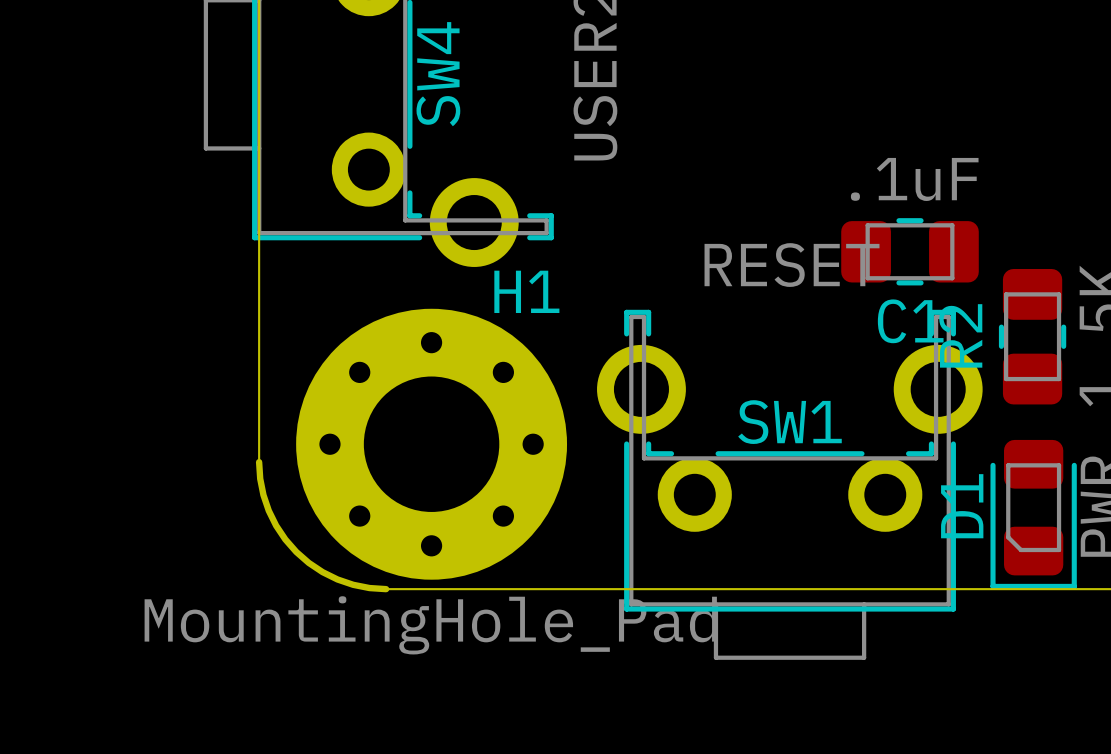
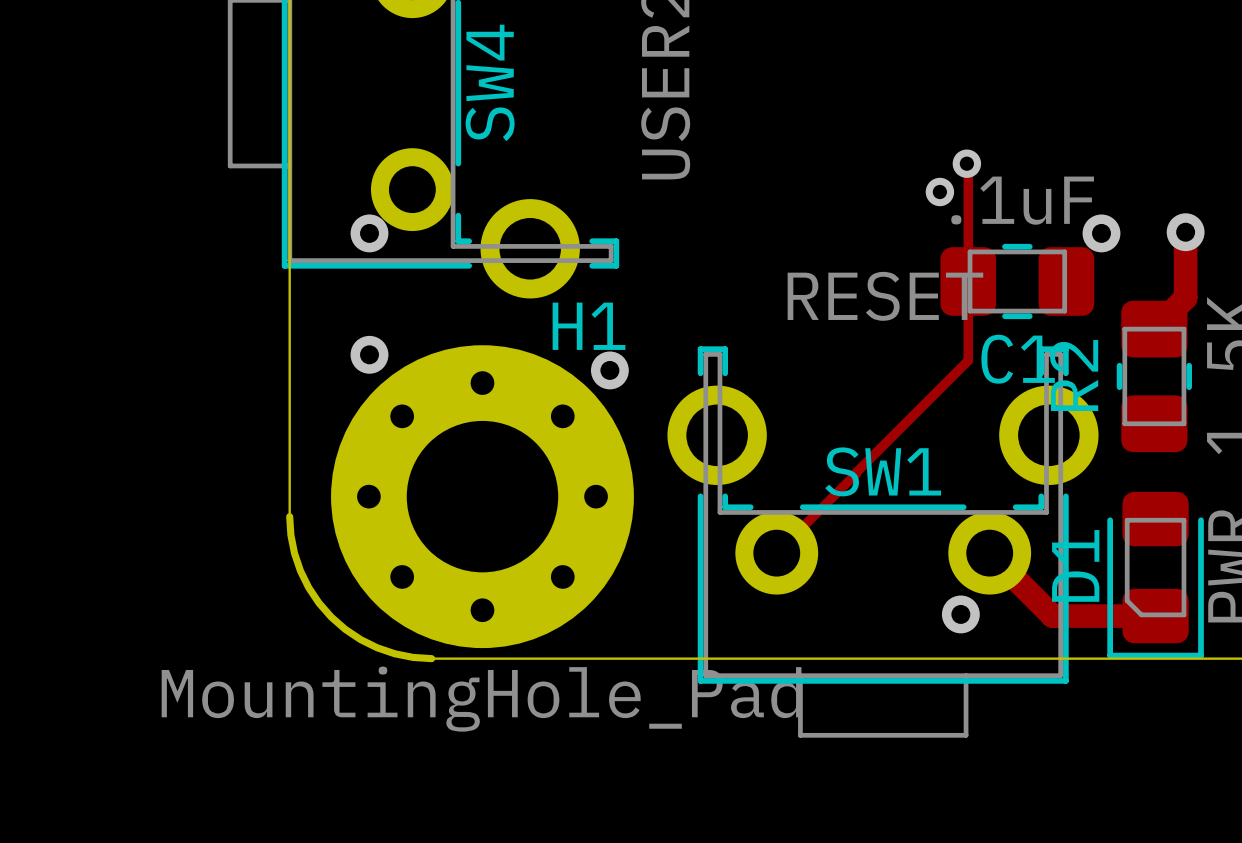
top track: none -> (966, 163) (968, 360) (776, 553)
via: none -> (966, 163)
via: none -> (939, 192)
top track: none -> (1185, 232) (1185, 297) (1154, 329)
via: none -> (1185, 232)
via: none -> (369, 233)
via: none -> (1101, 233)
via: none -> (369, 354)
via: none -> (609, 370)
top track: none -> (989, 573) (989, 553) (1052, 616) (1155, 616)
via: none -> (960, 614)

